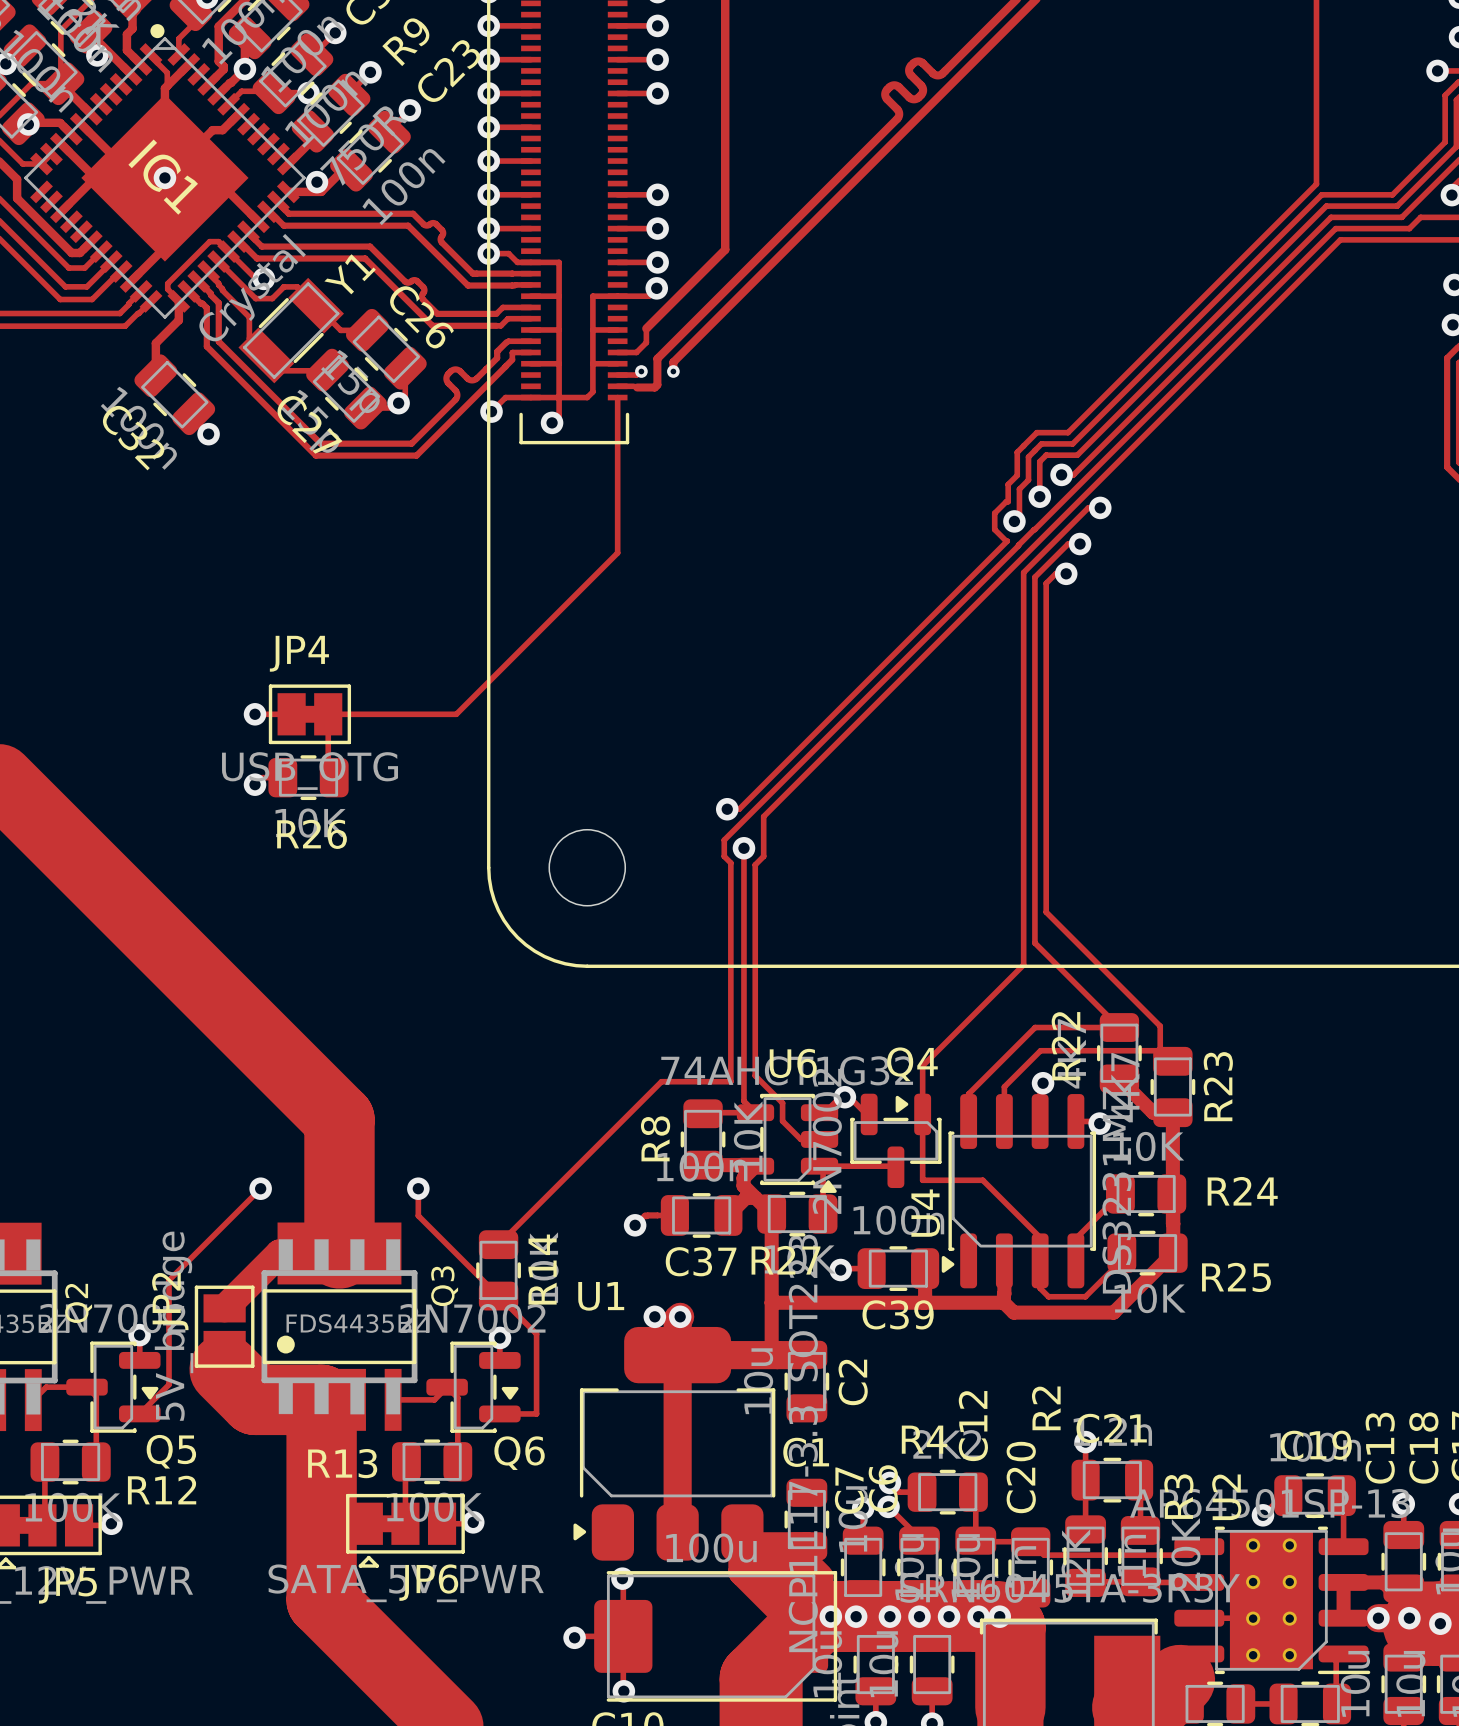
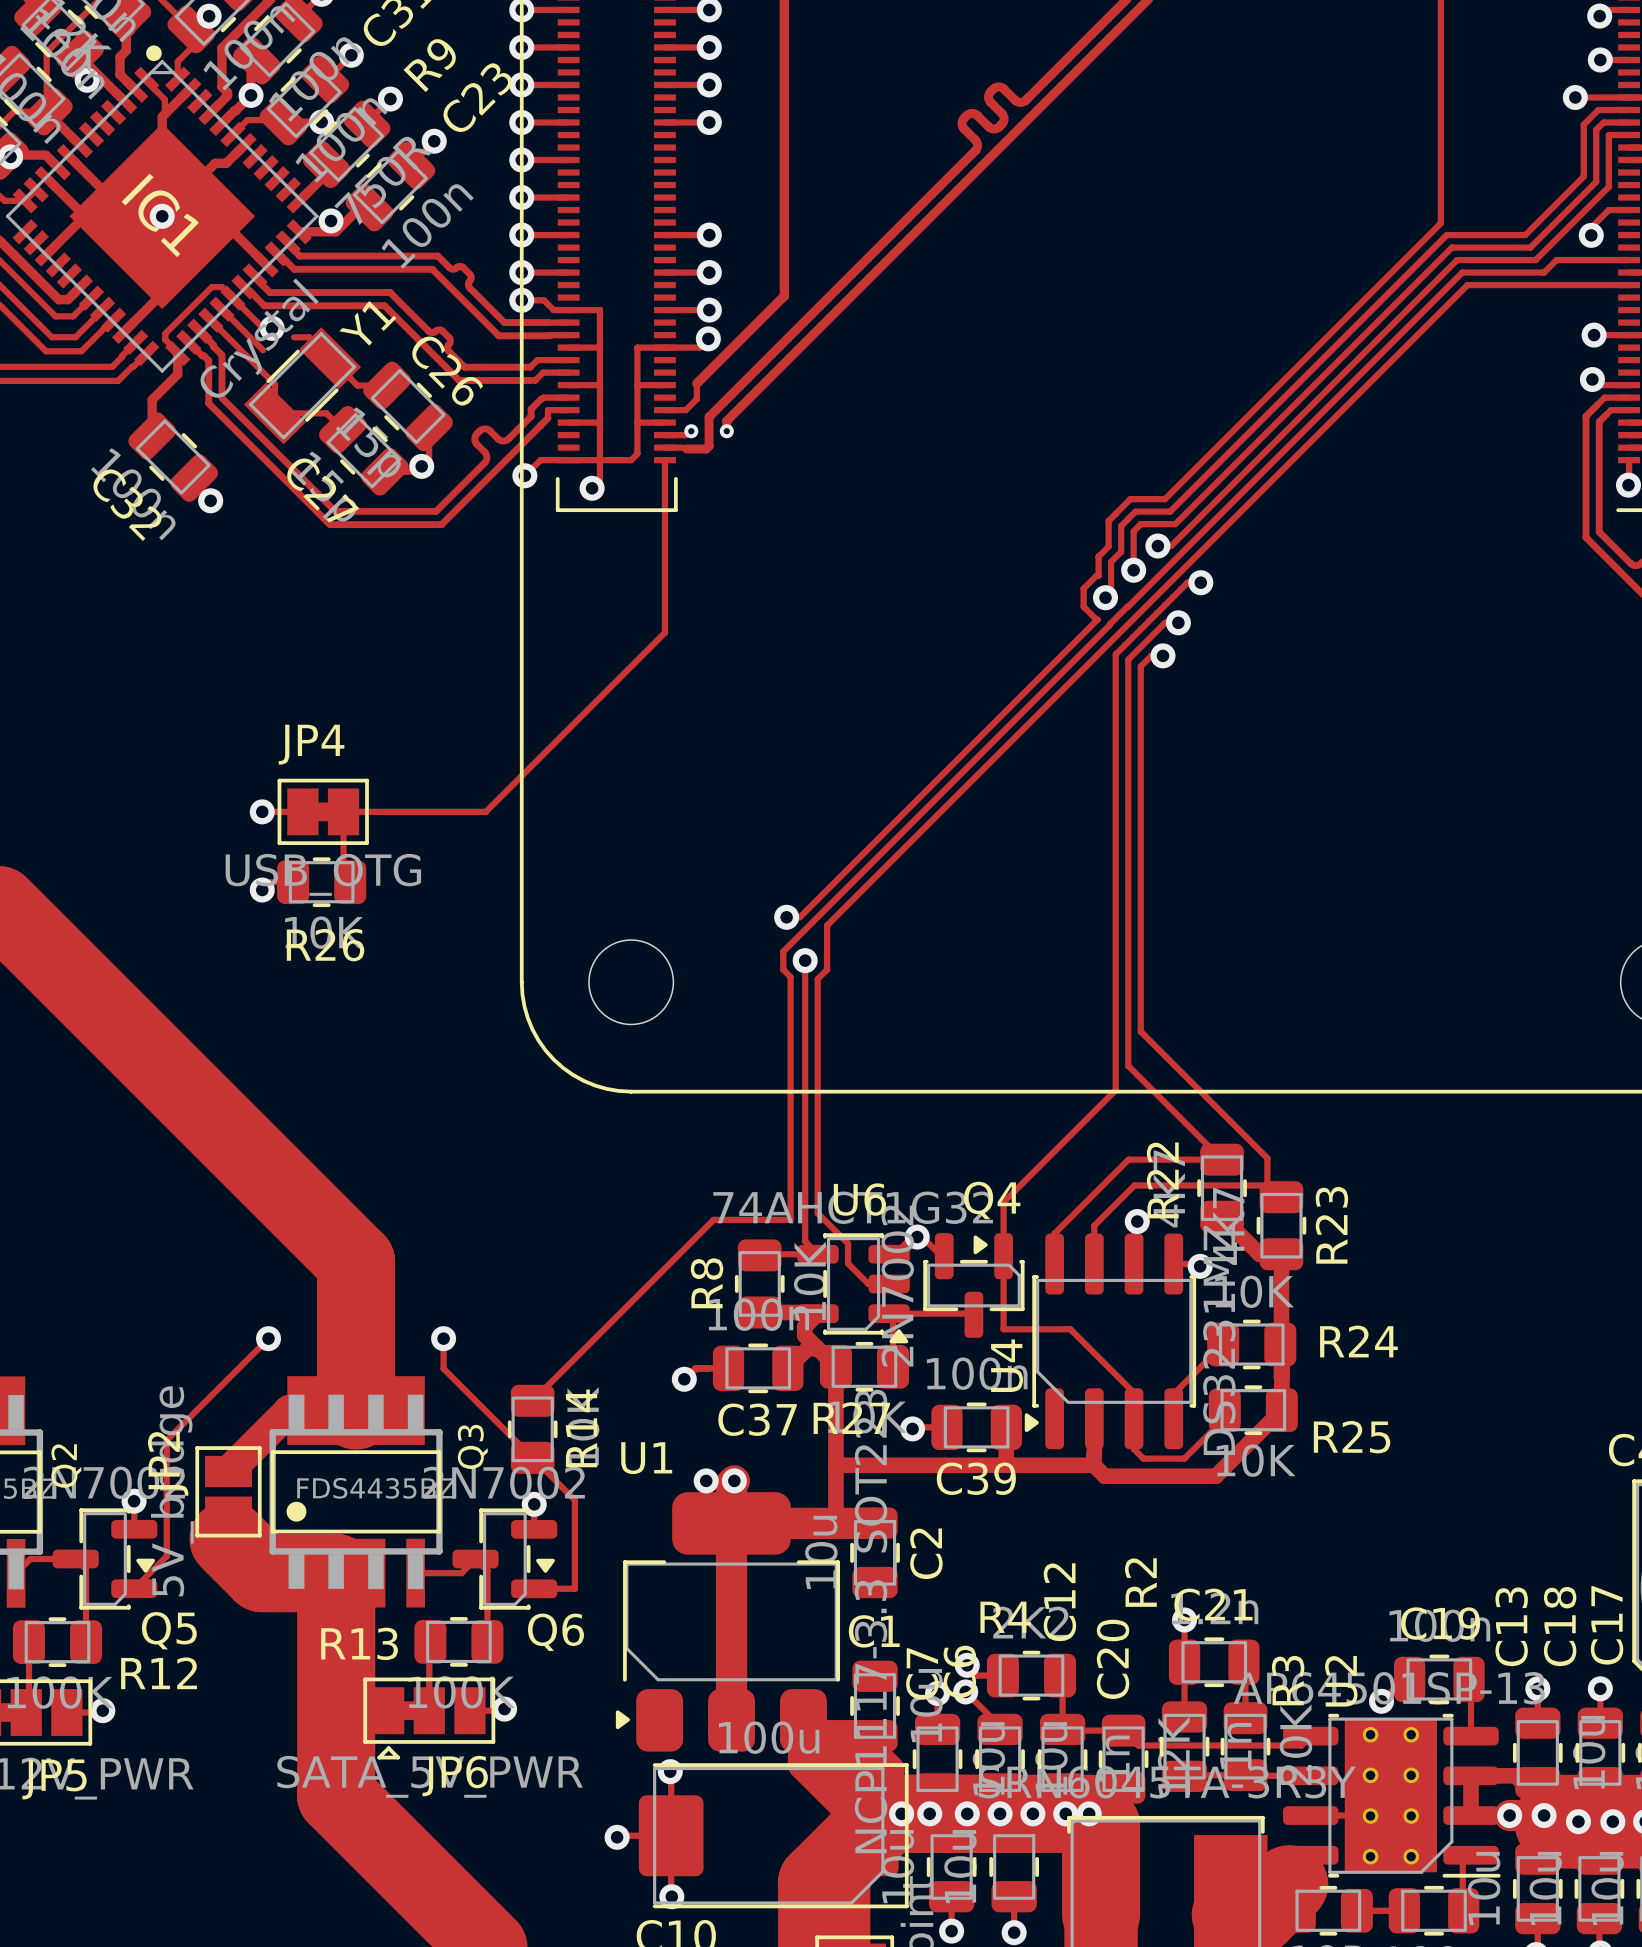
track: (208, 273) (249, 317) (249, 338) (281, 370) (327, 370) -> (210, 320) (274, 384) (274, 413) (326, 413) (342, 429)
track: (283, 287) (272, 298) (255, 298) -> none

